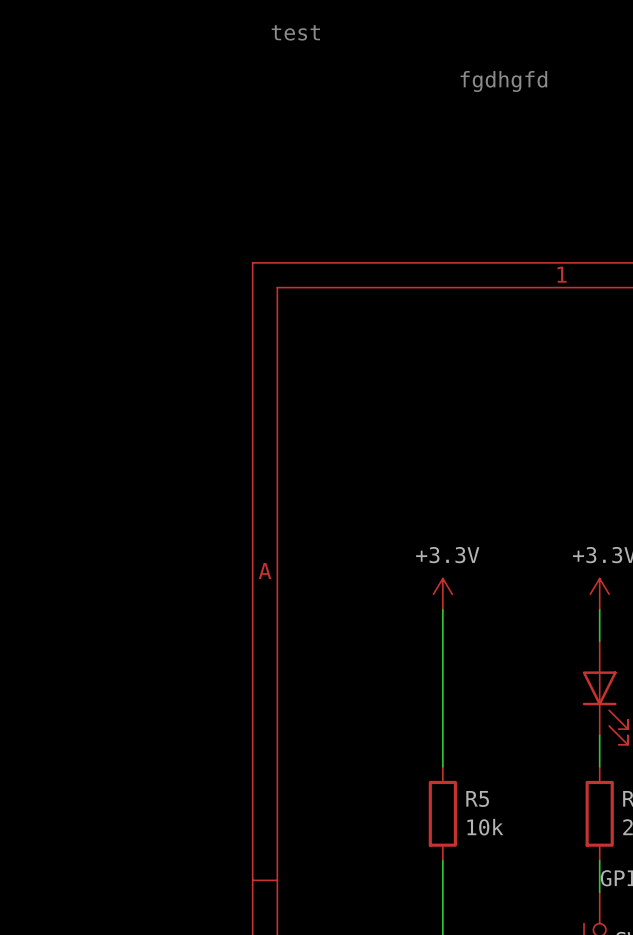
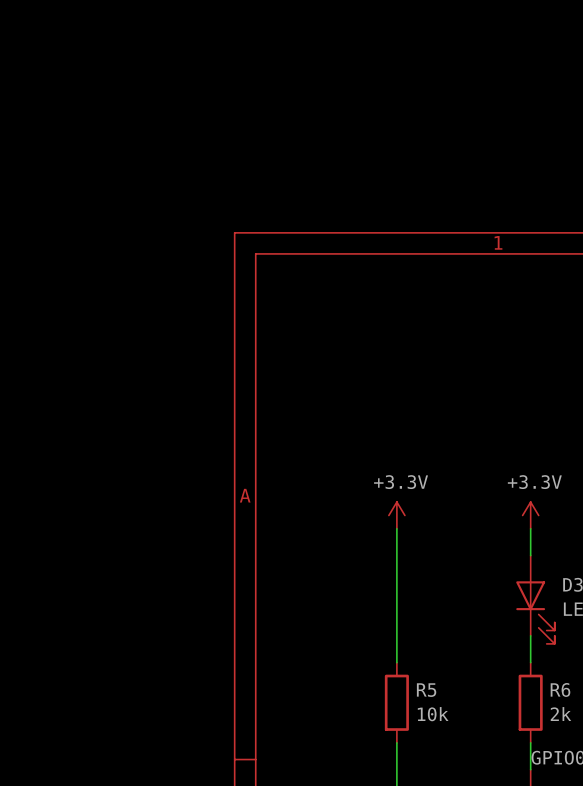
text: test (295, 32) -> none
text: fgdhgfd (503, 81) -> none

